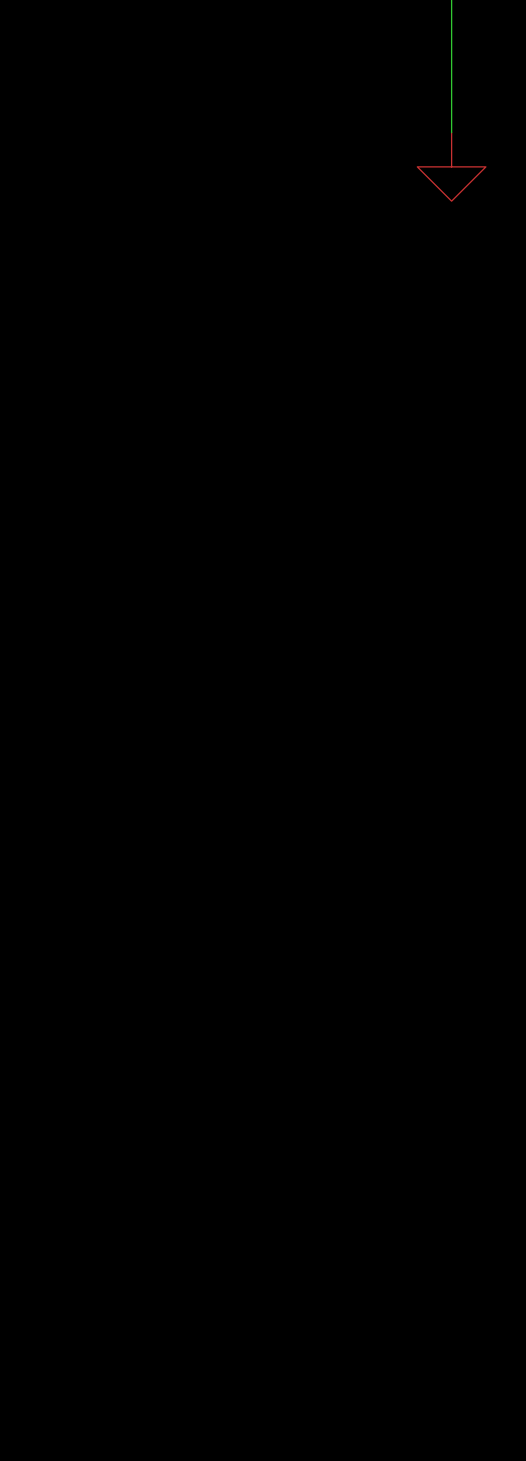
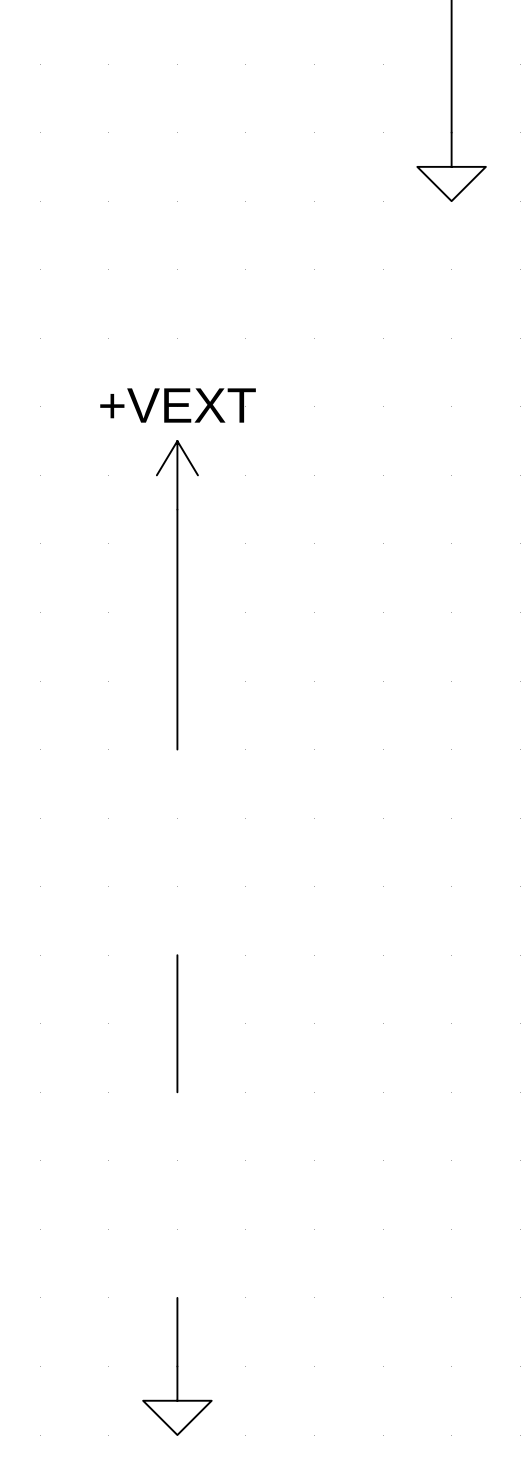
power symbol: none -> +VEXT (177, 475)
wire: none -> (177, 509) (177, 749)
wire: none -> (177, 955) (177, 1092)
wire: none -> (177, 1297) (177, 1366)
power symbol: none -> (177, 1400)

